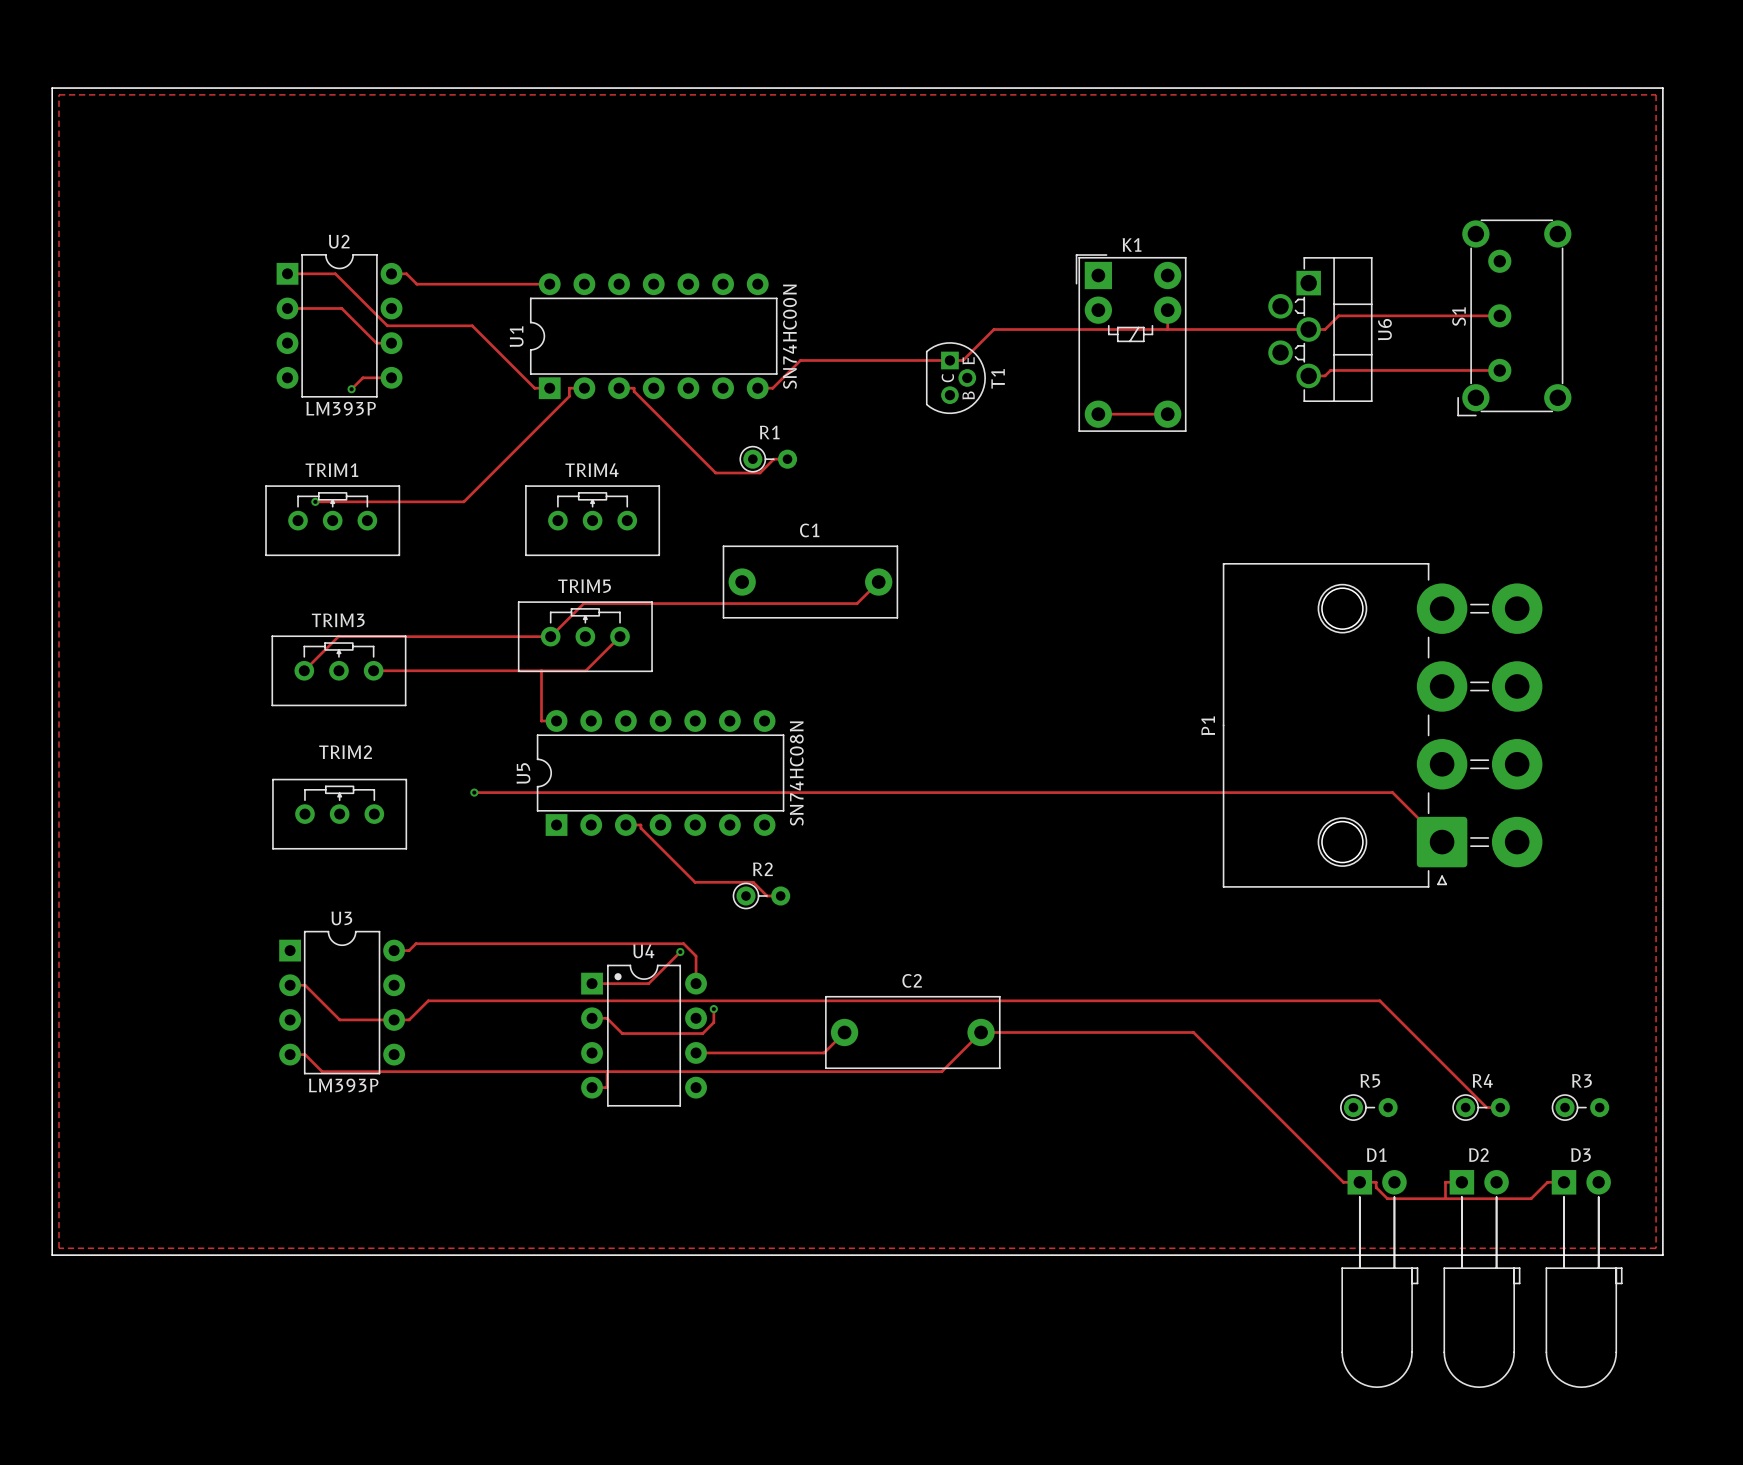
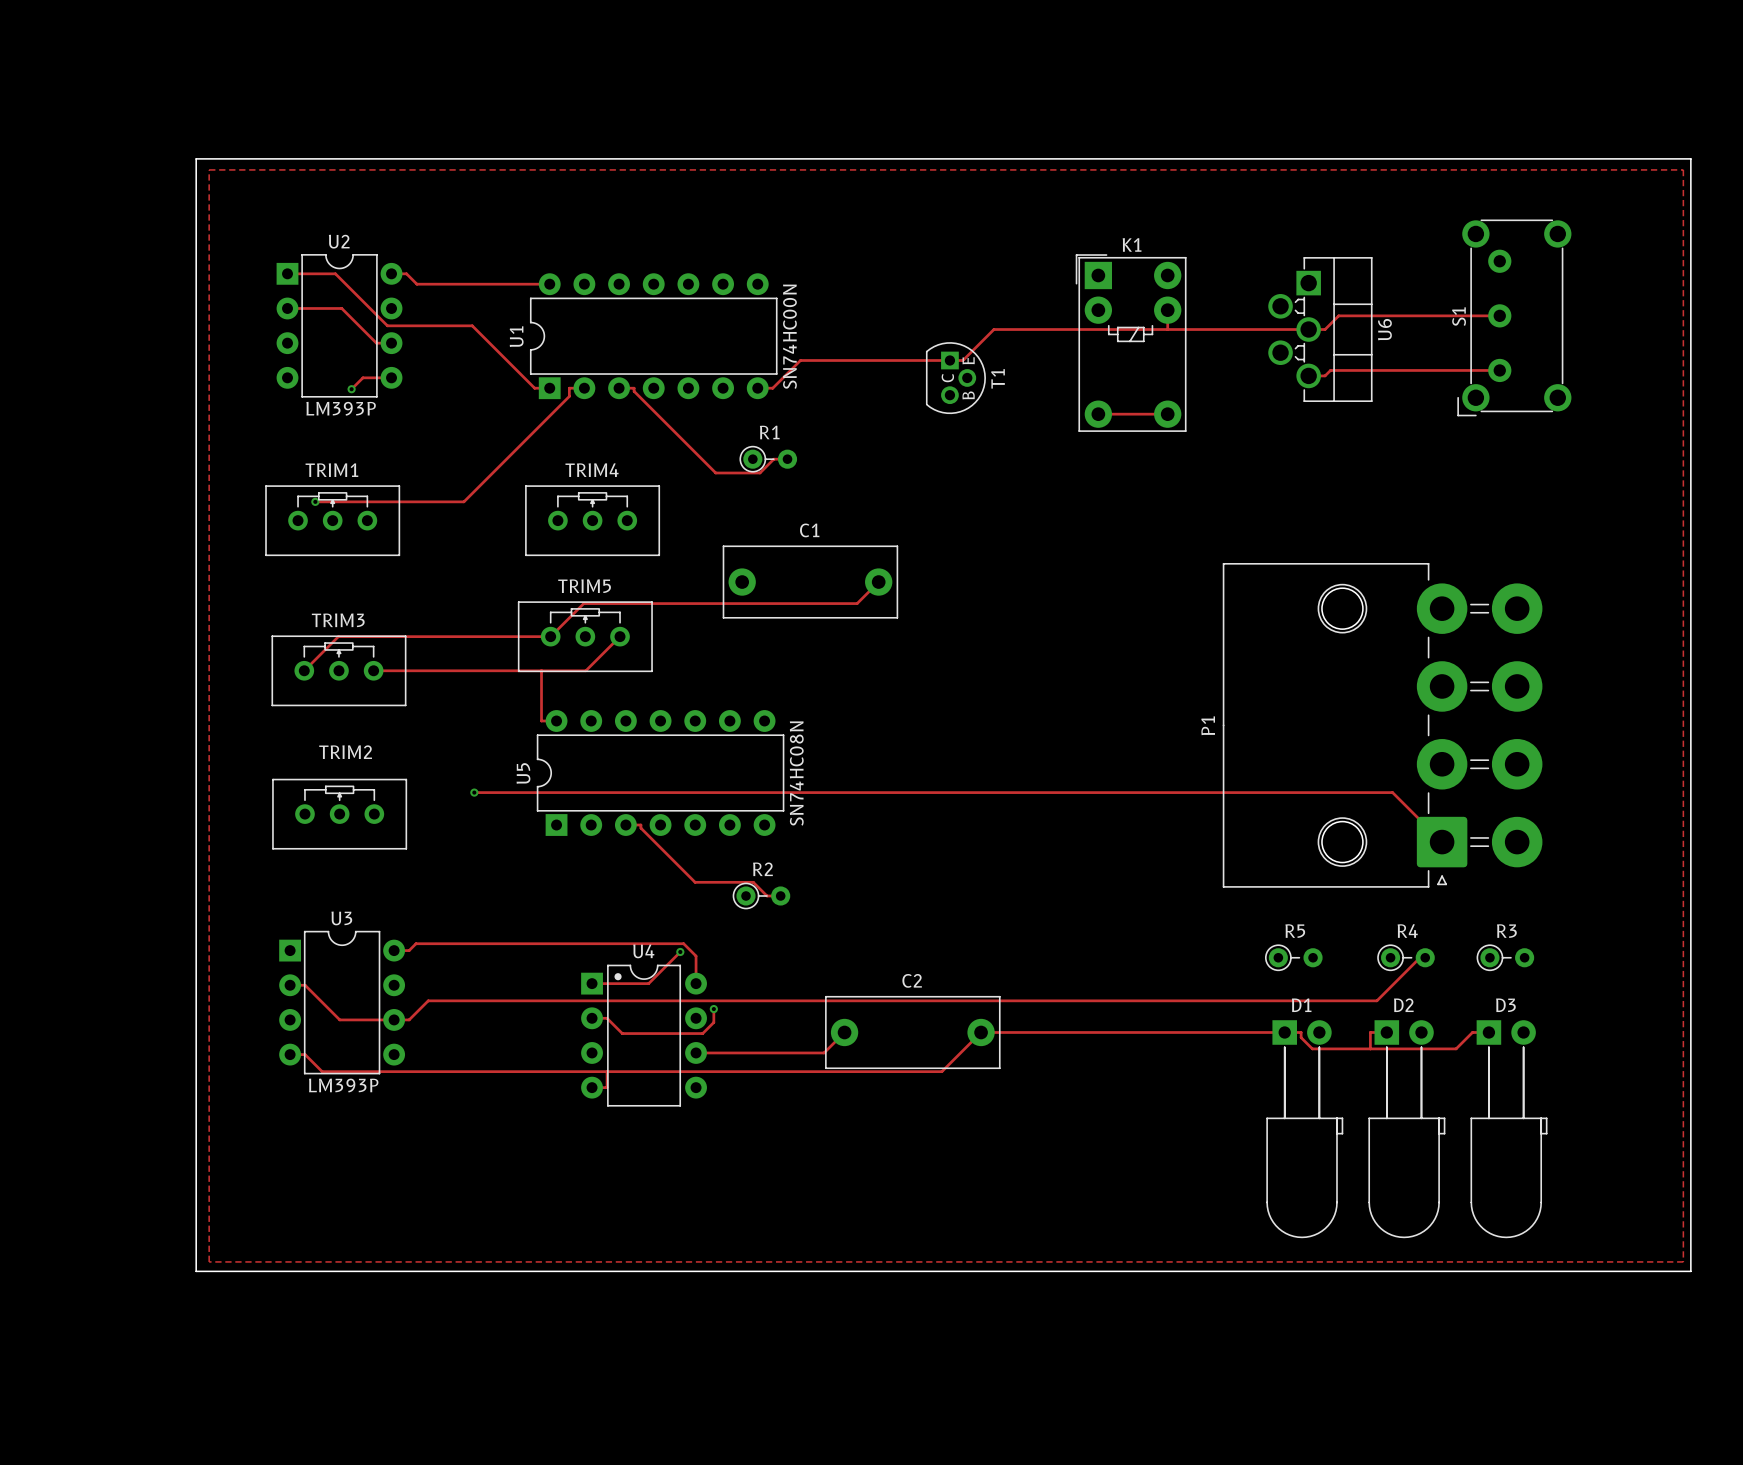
board edge: (52, 88) (1662, 88) (1662, 1255) (52, 1255) (52, 88) -> (196, 158) (196, 1271) (1690, 1271) (1690, 158) (196, 158)
zone outline: (59, 94) (1656, 94) (1656, 1248) (59, 1248) (59, 94) -> (209, 169) (209, 1261) (1683, 1261) (1683, 169) (209, 169)
track: (1376, 1000) (1379, 1000) (1486, 1107) (1500, 1107) -> (1376, 1000) (1420, 957) (1425, 957)
track: (1193, 1032) (1343, 1182) (1376, 1182) (1376, 1187) (1387, 1198) (1531, 1198) (1547, 1182) (1563, 1182) -> (1193, 1032) (1301, 1032) (1301, 1037) (1312, 1048) (1456, 1048) (1472, 1032) (1488, 1032)
R5 position: (1368, 1107) -> (1293, 957)
R4 position: (1481, 1107) -> (1405, 957)
R3 position: (1580, 1107) -> (1505, 957)
track: (1461, 1182) (1445, 1182) (1445, 1198) -> (1386, 1032) (1370, 1032) (1370, 1048)
D1 position: (1379, 1279) -> (1304, 1129)
D2 position: (1481, 1279) -> (1406, 1129)
D3 position: (1584, 1279) -> (1508, 1129)

